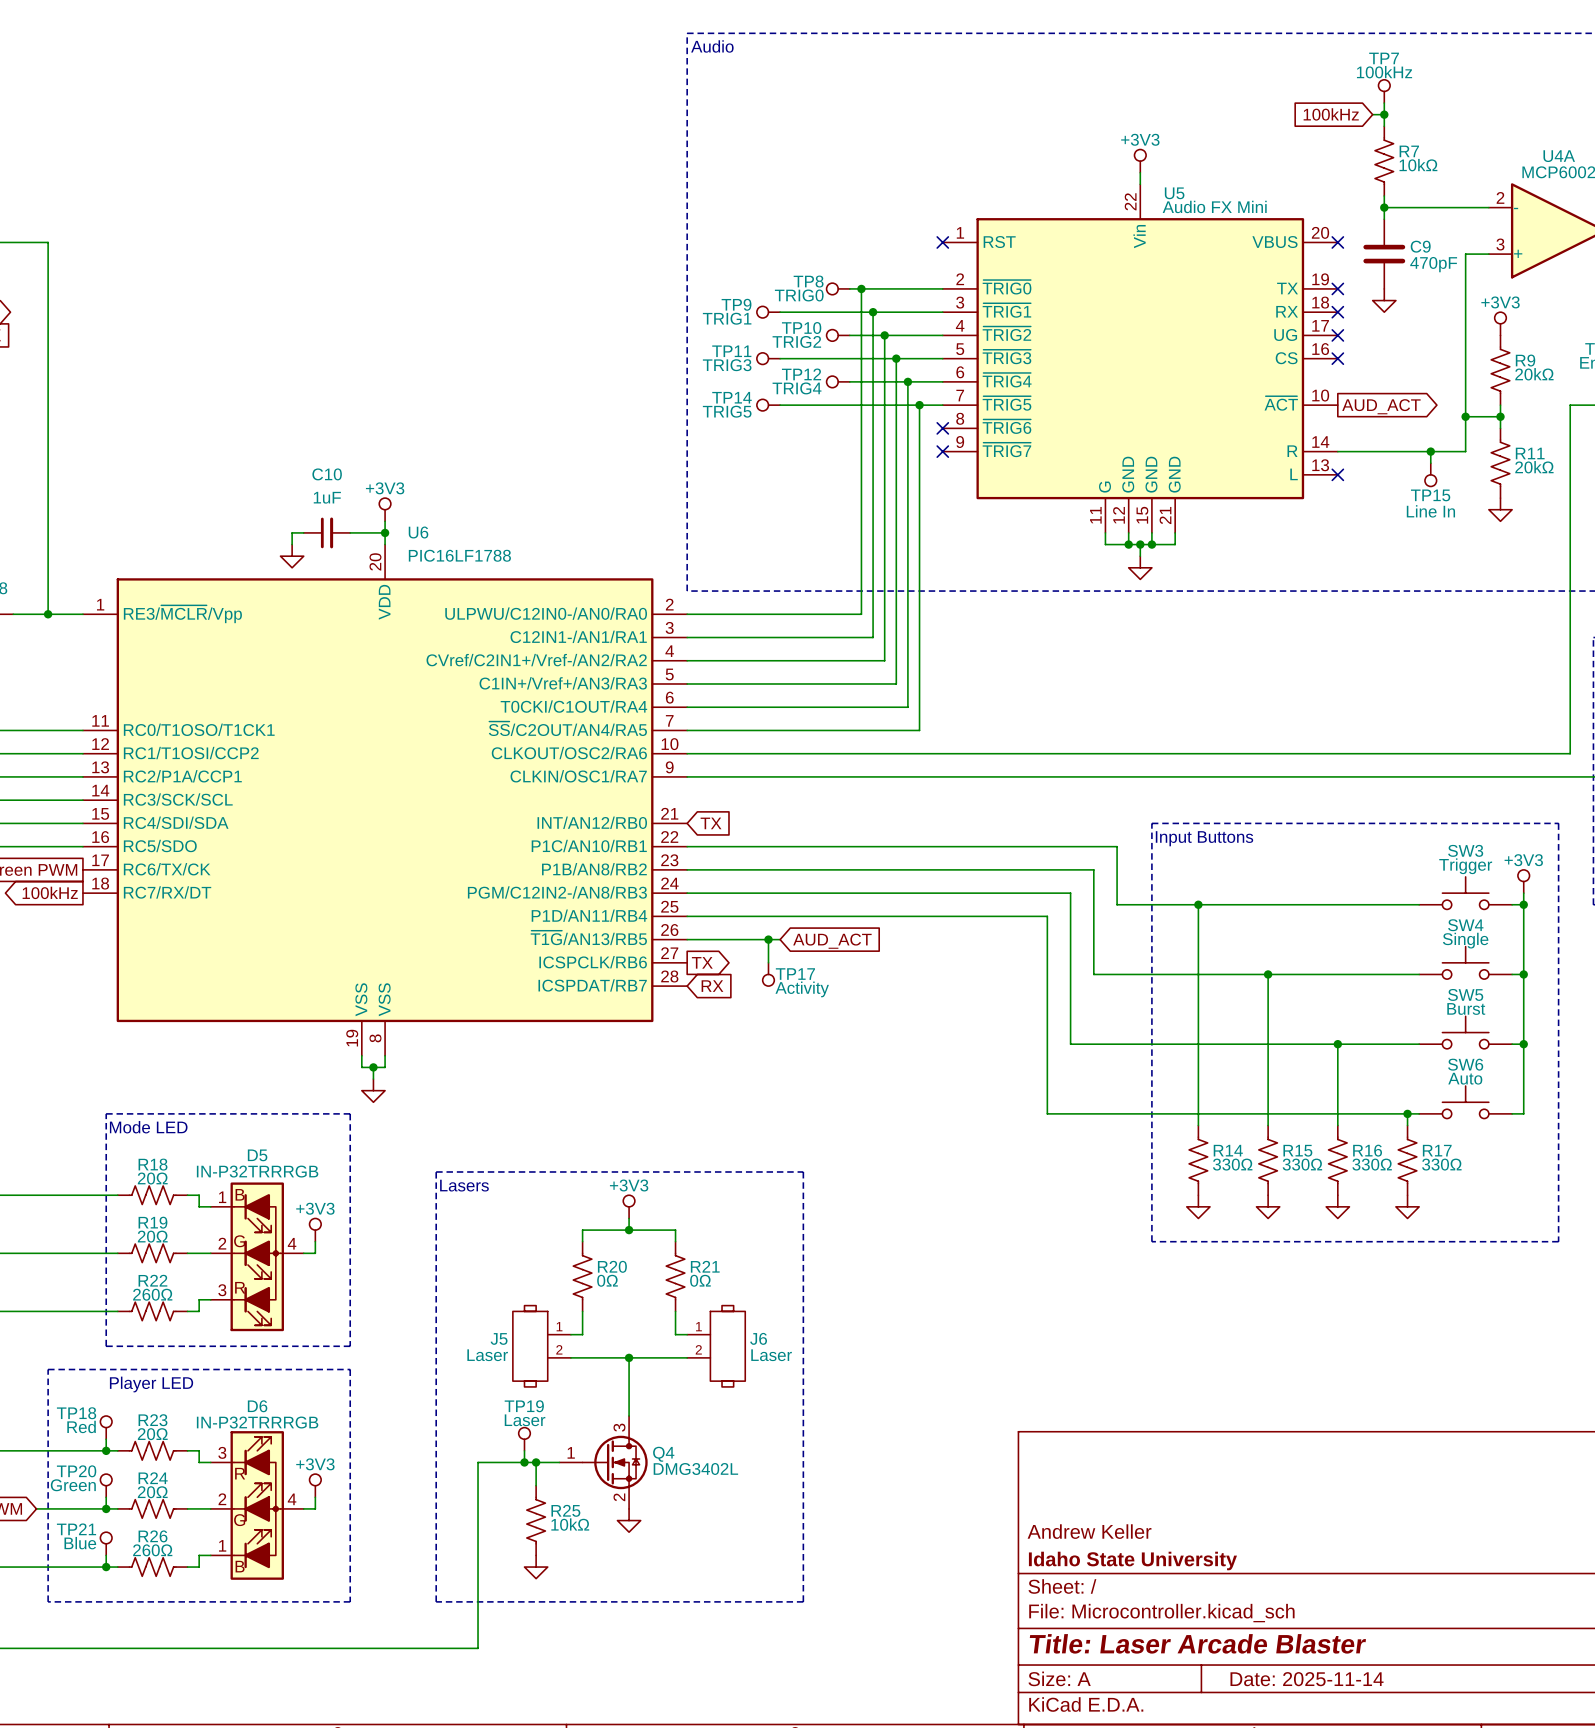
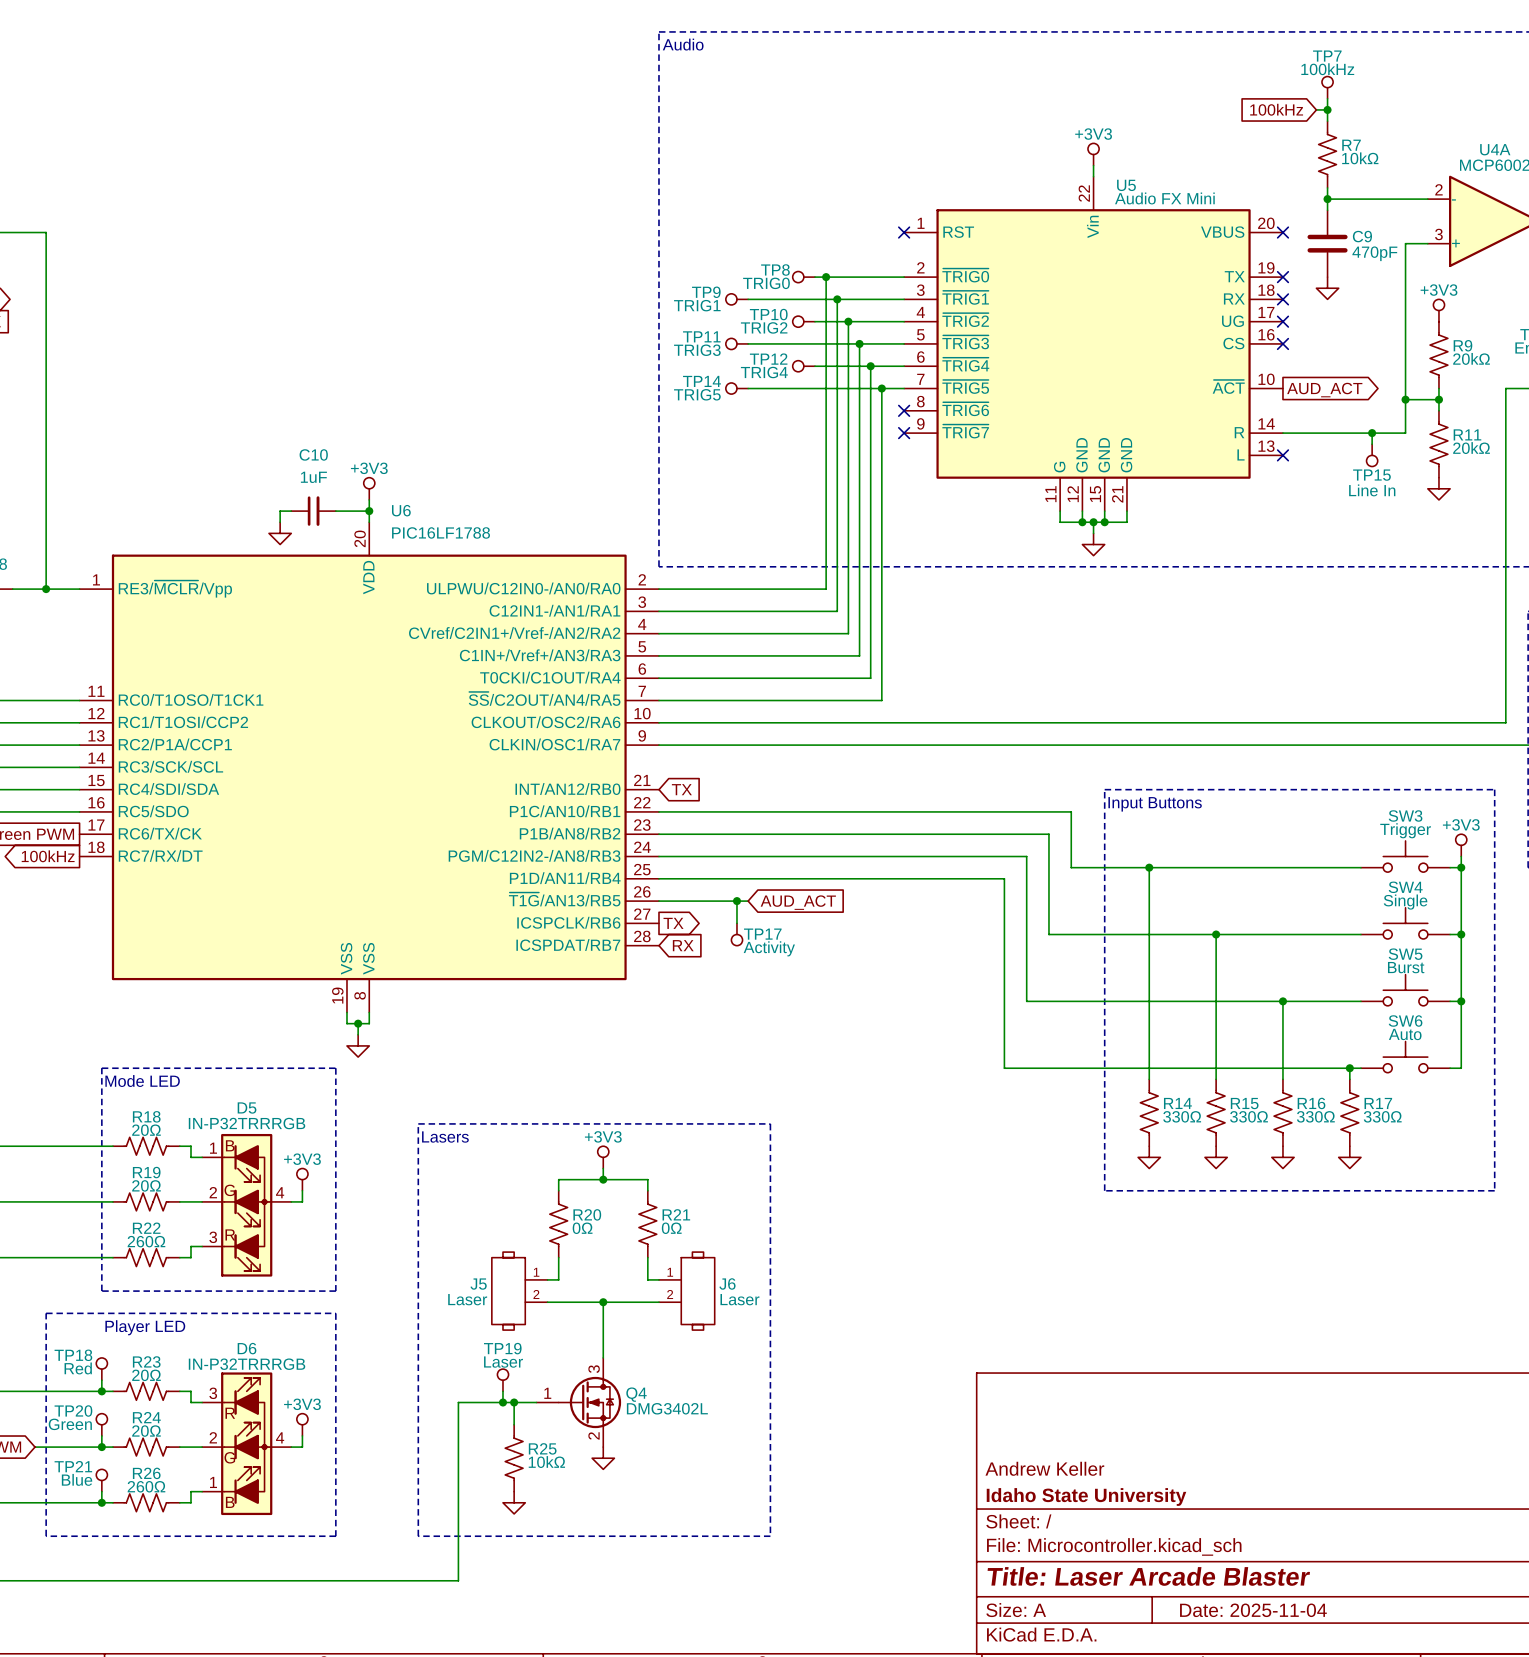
title block: Date: 2025-11-14 (1307, 1679) -> Date: 2025-11-04 (1253, 1610)

